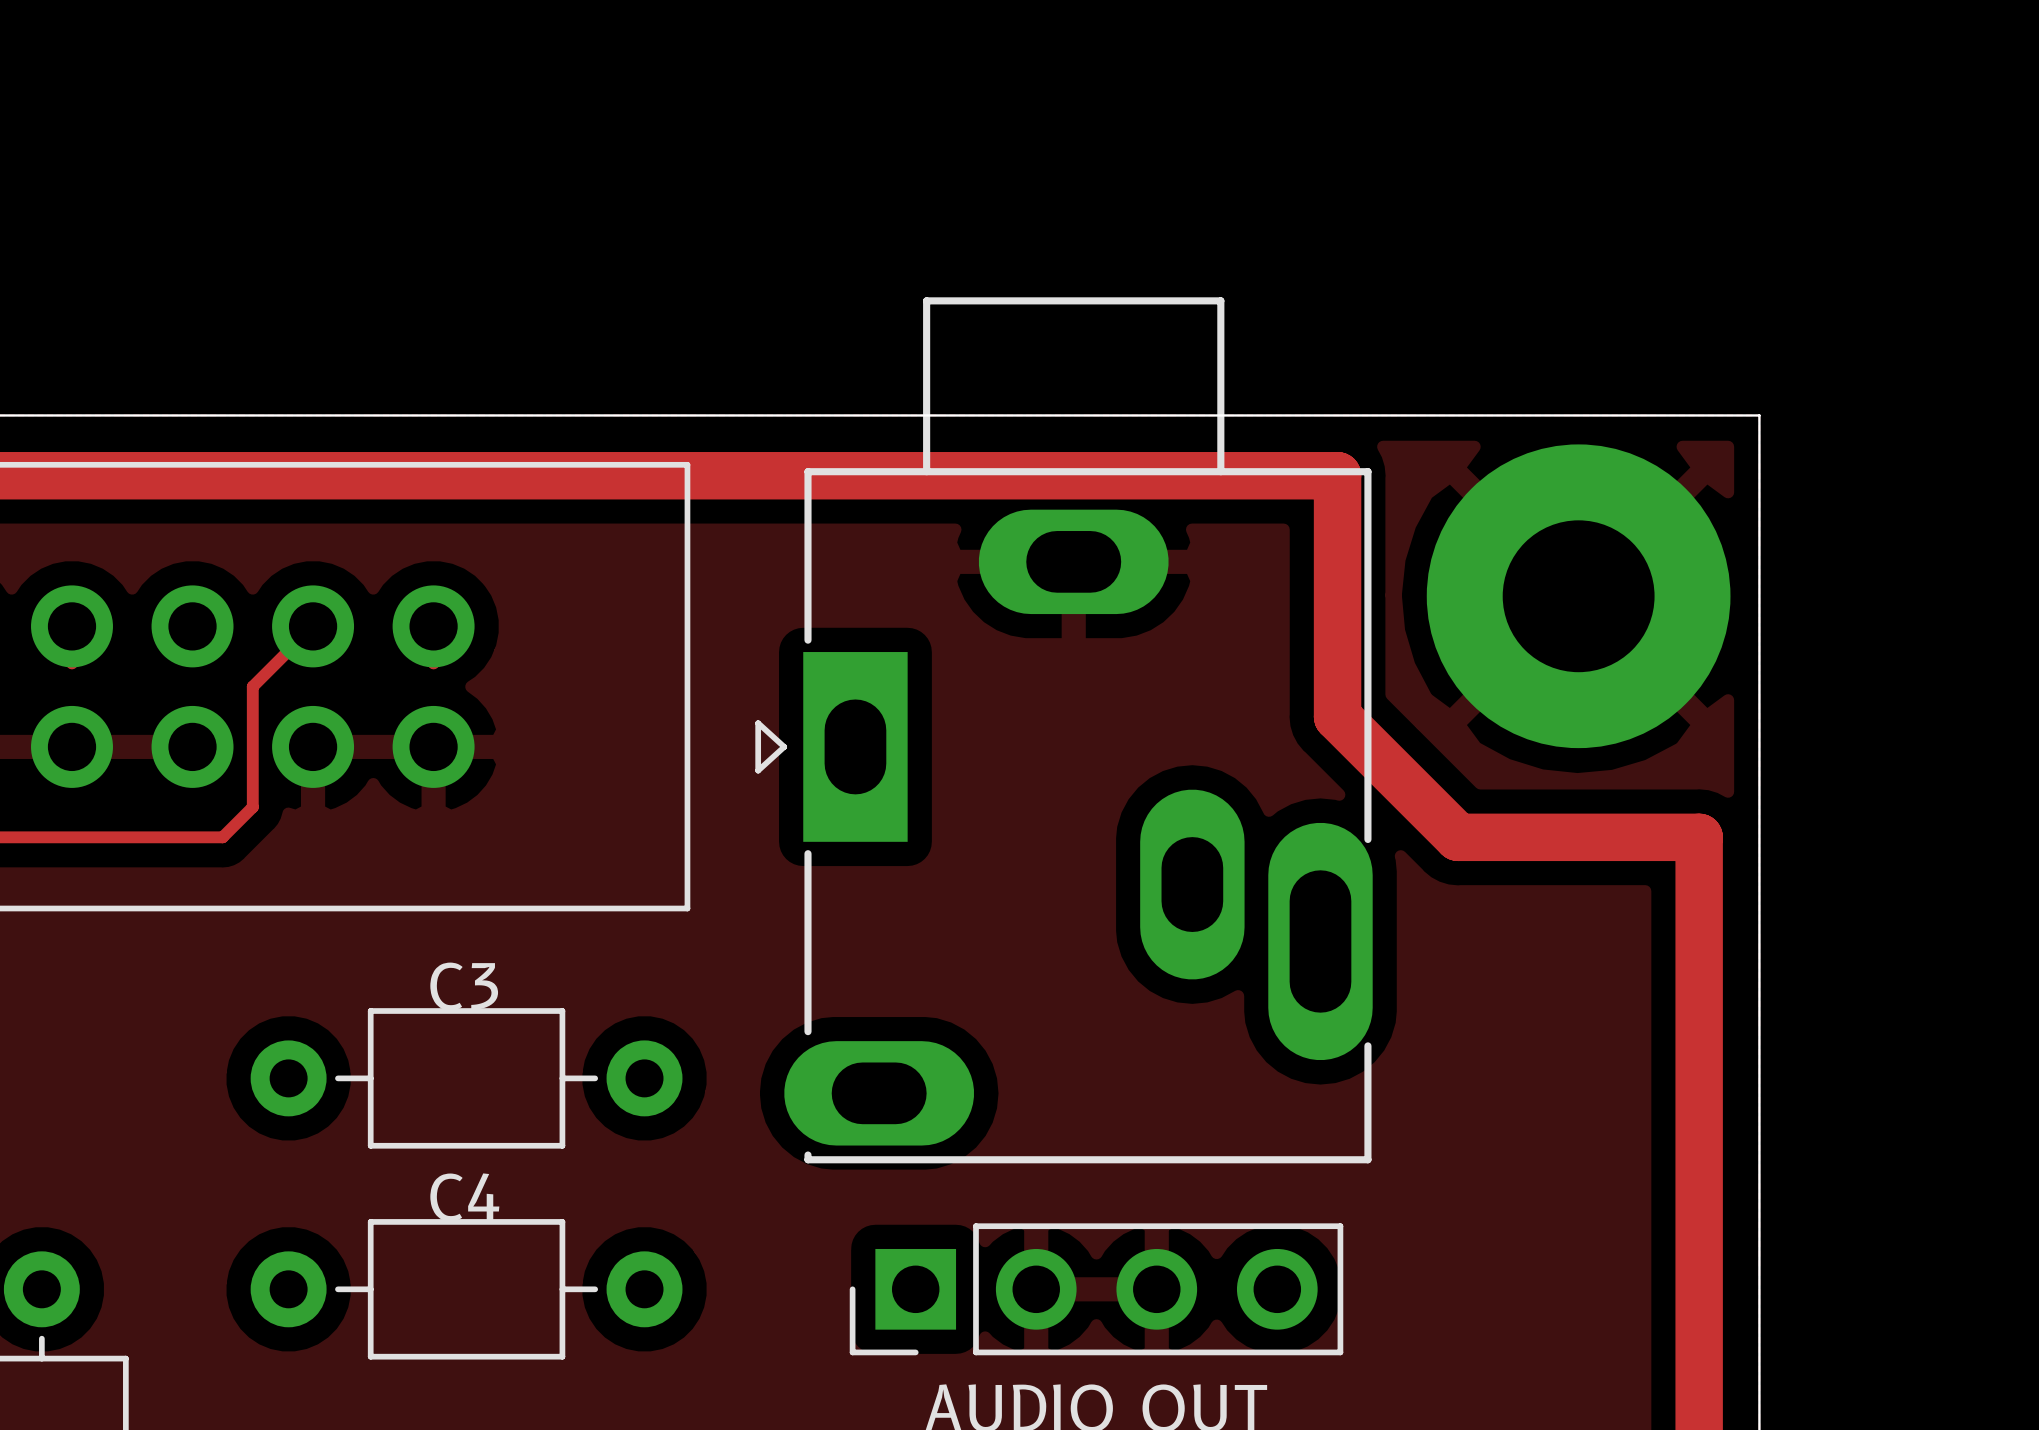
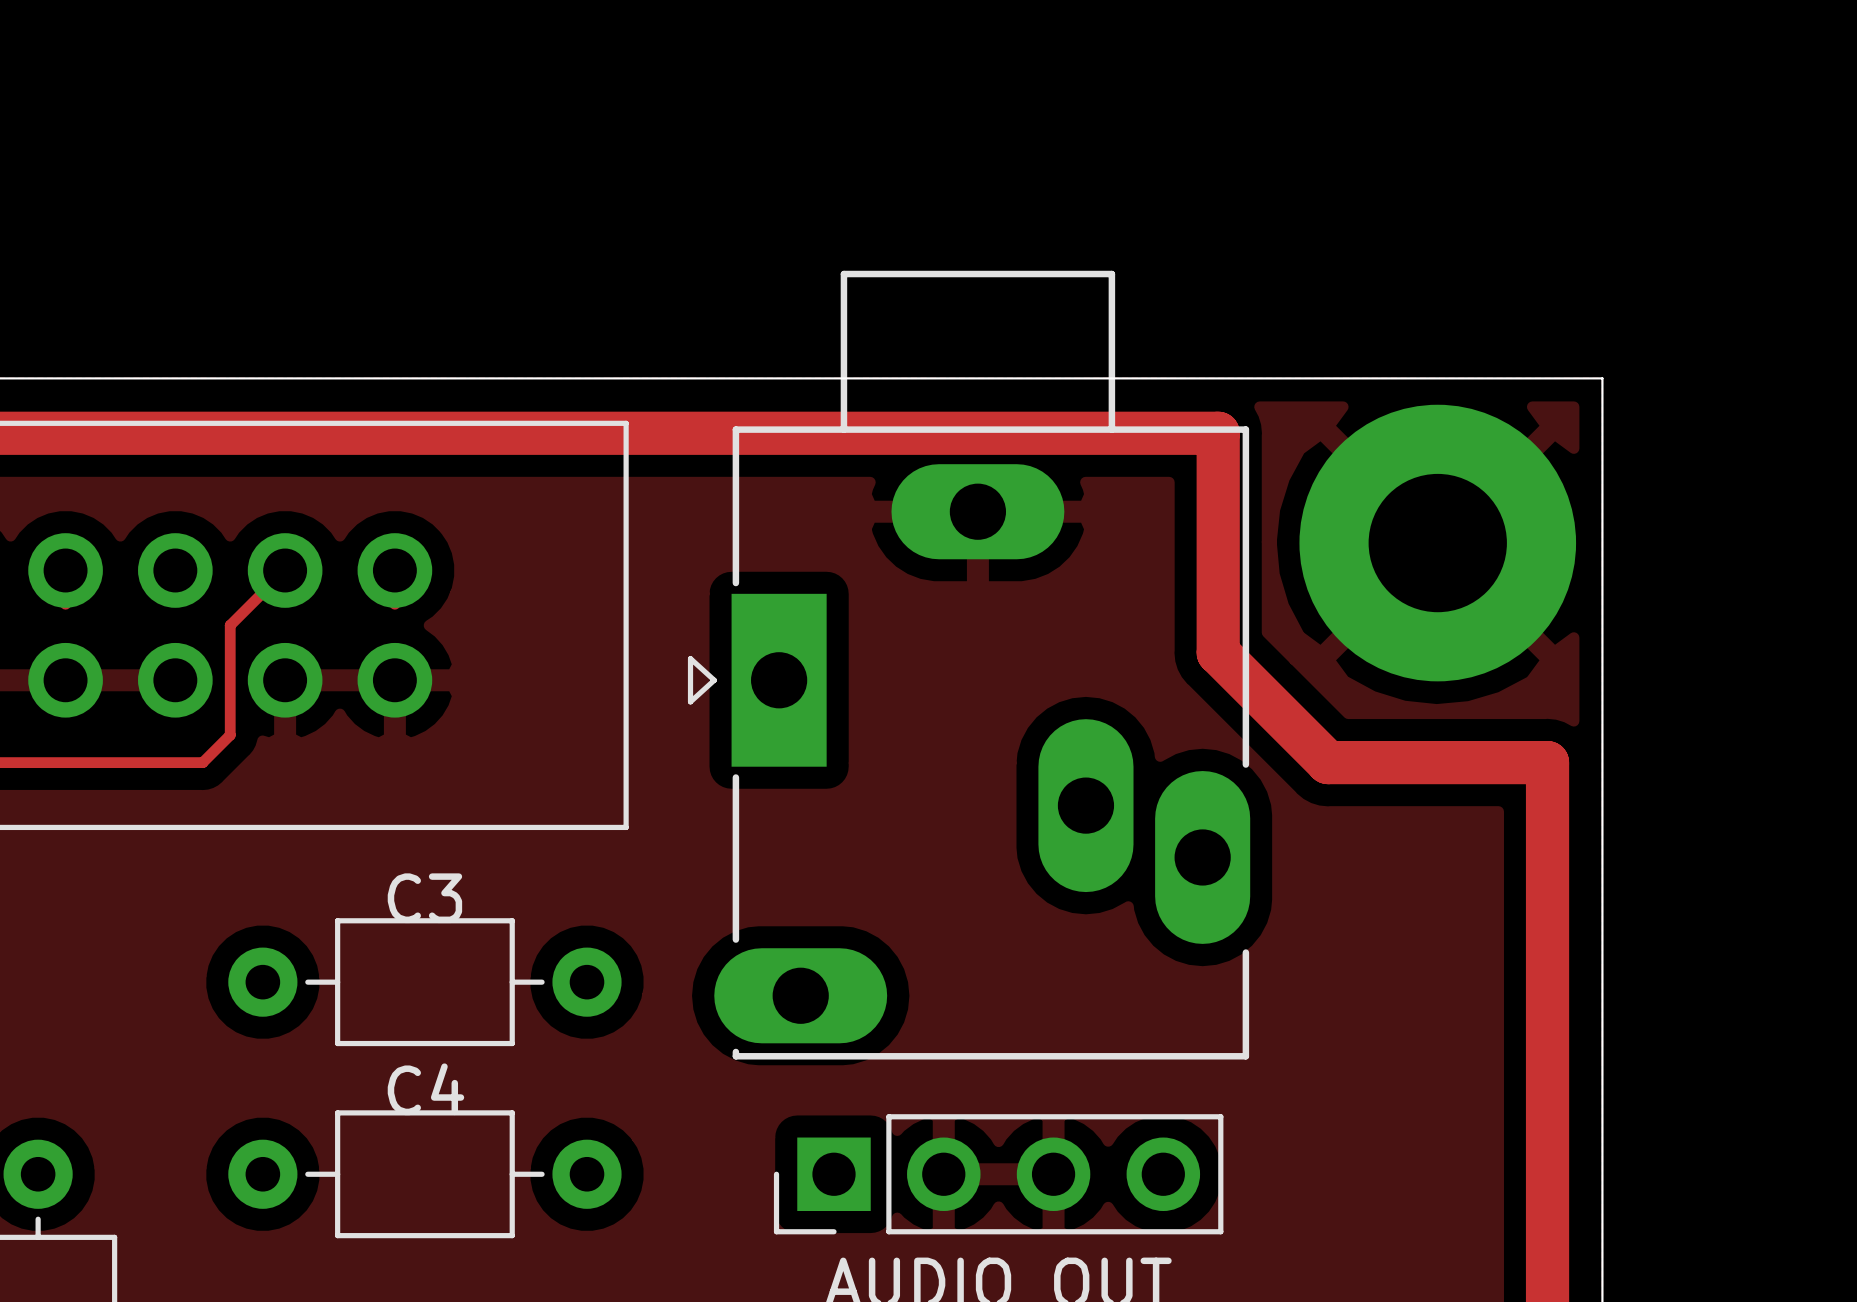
part footprint: [755, 297, 1373, 1164] -> [687, 270, 1251, 1060]

